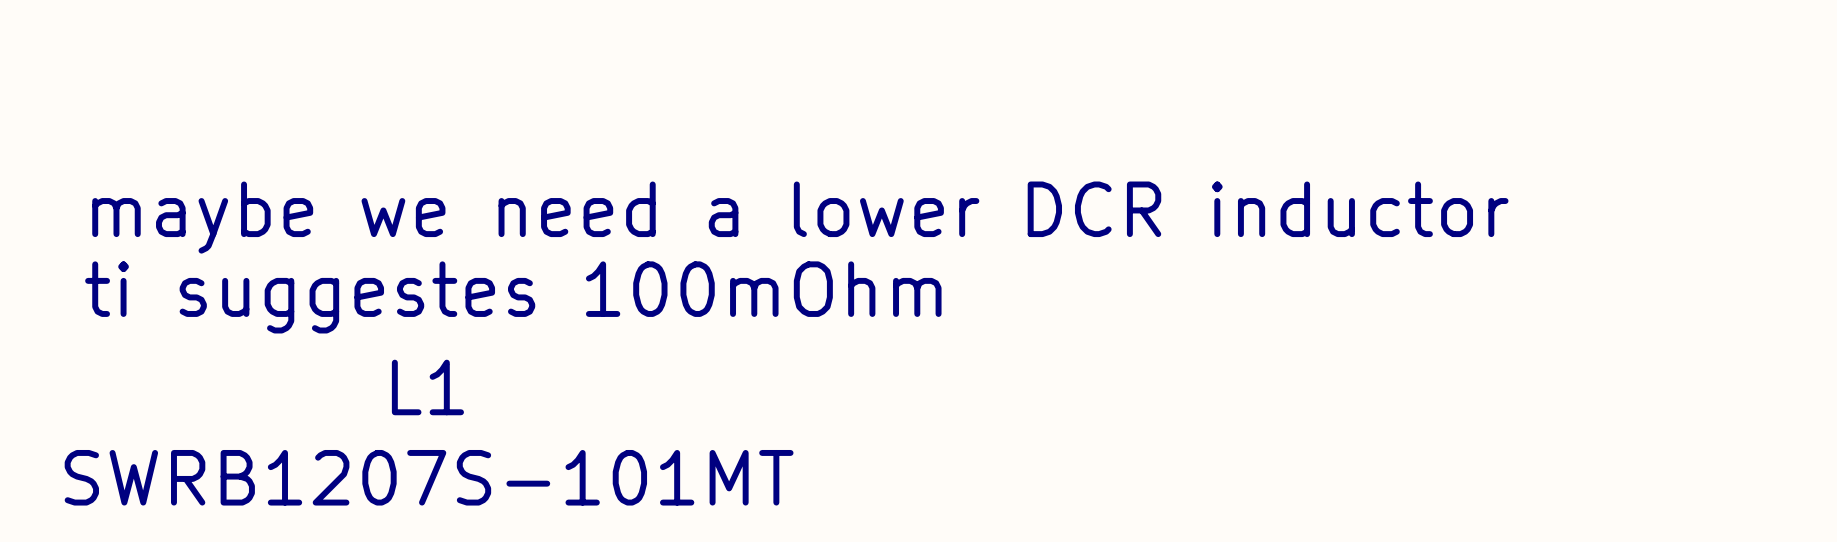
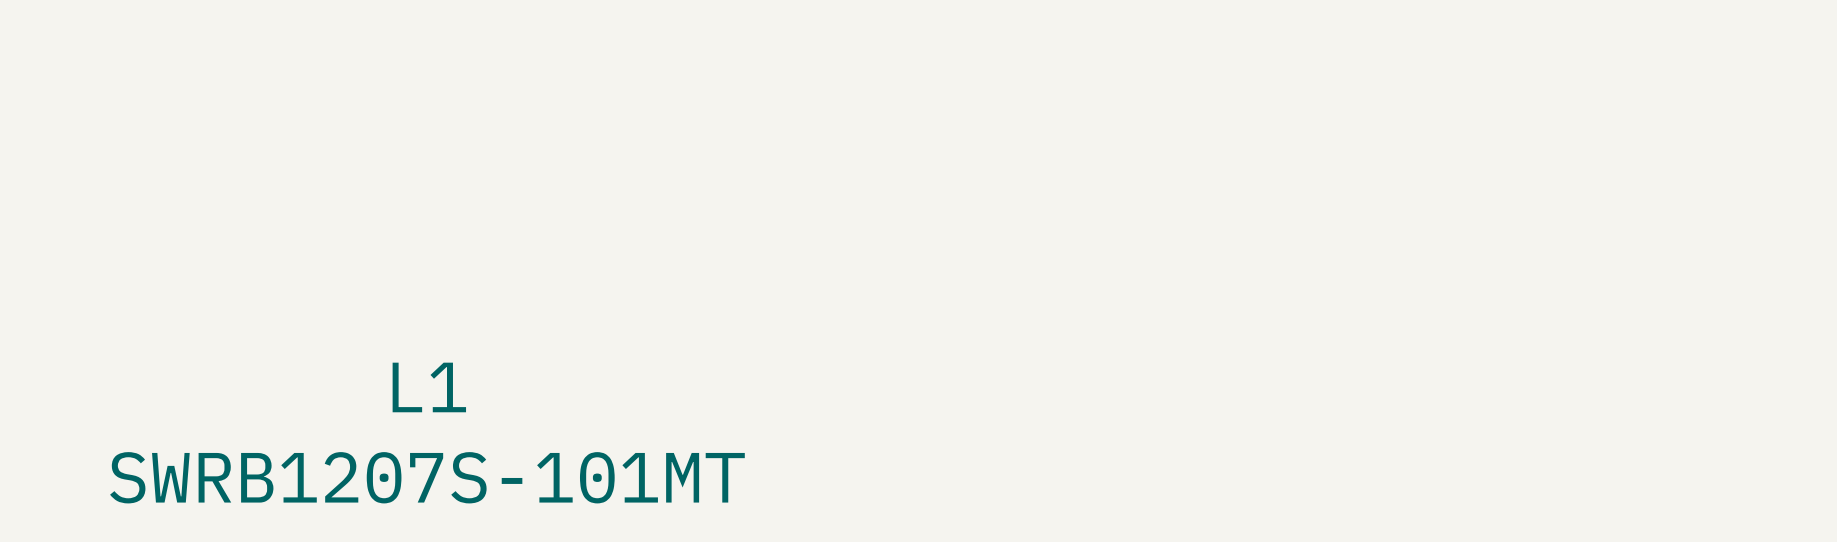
text: maybe we need a lower DCR inductor (800, 217) -> none
text: ti suggestes 100mOhm (513, 297) -> none

